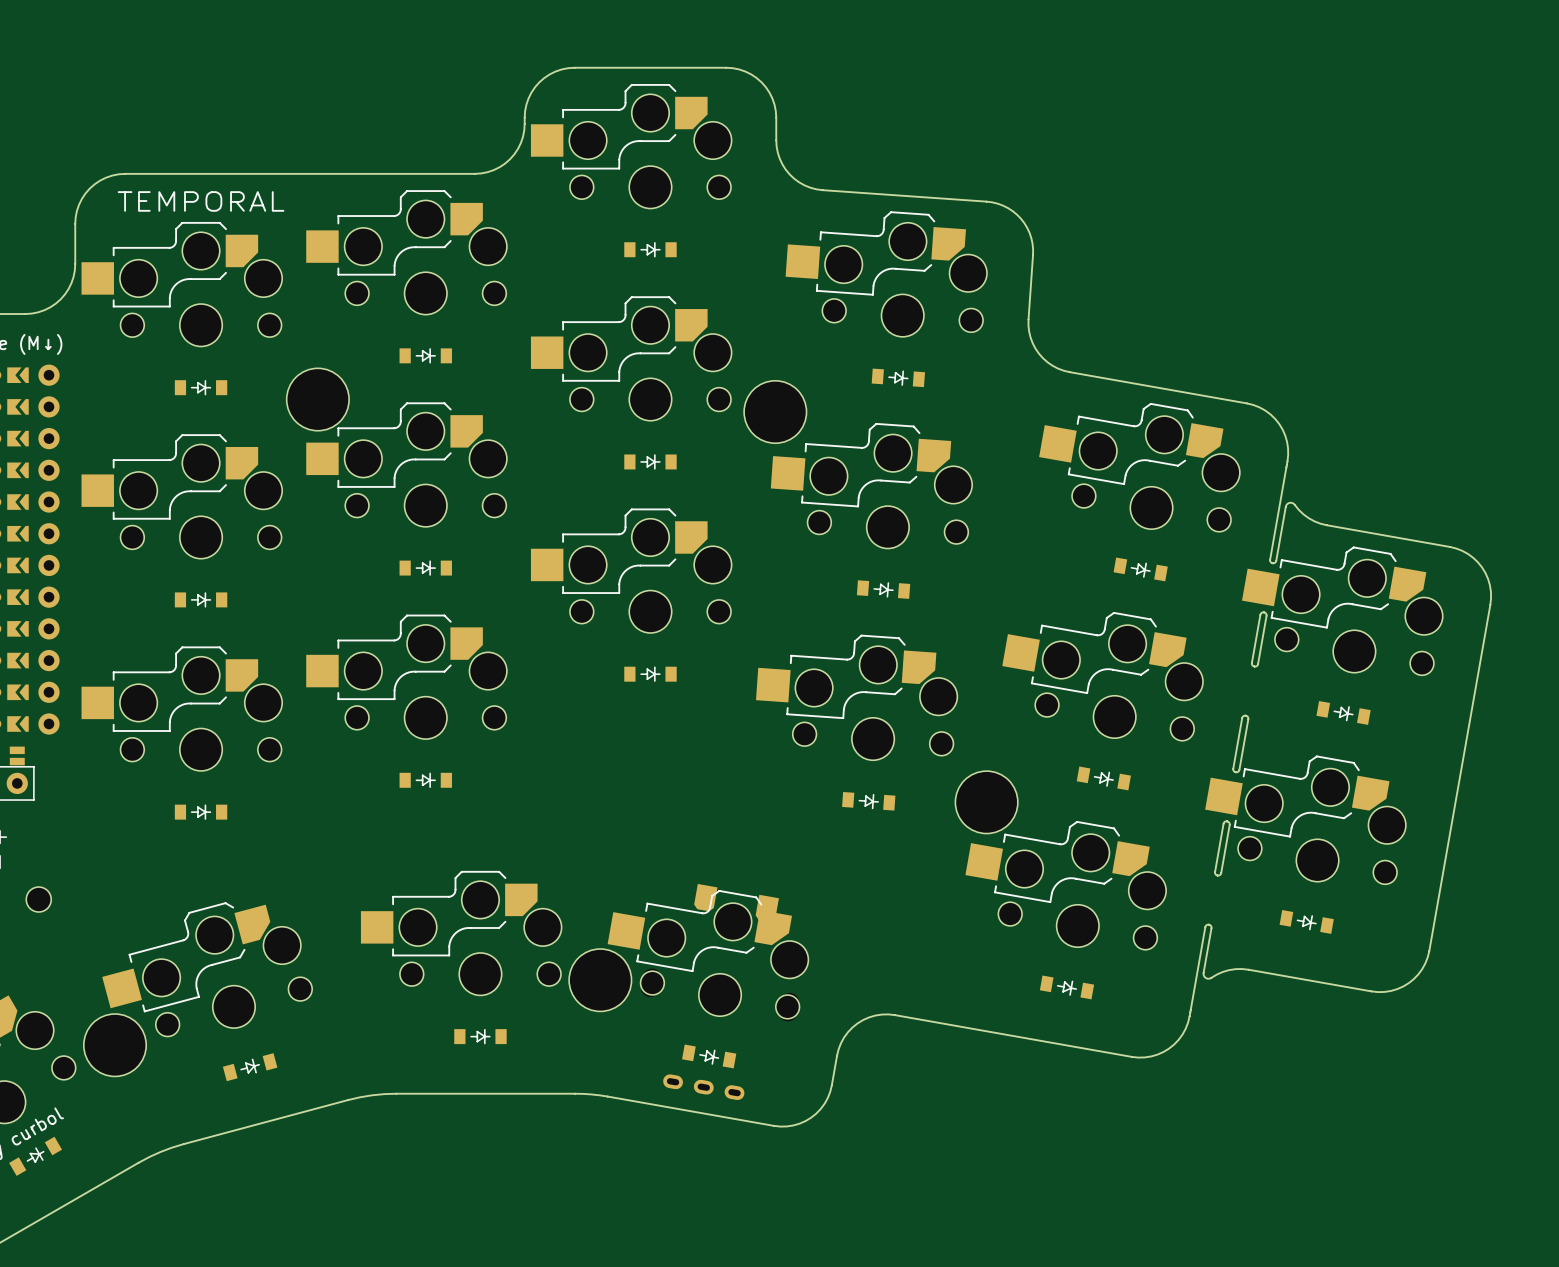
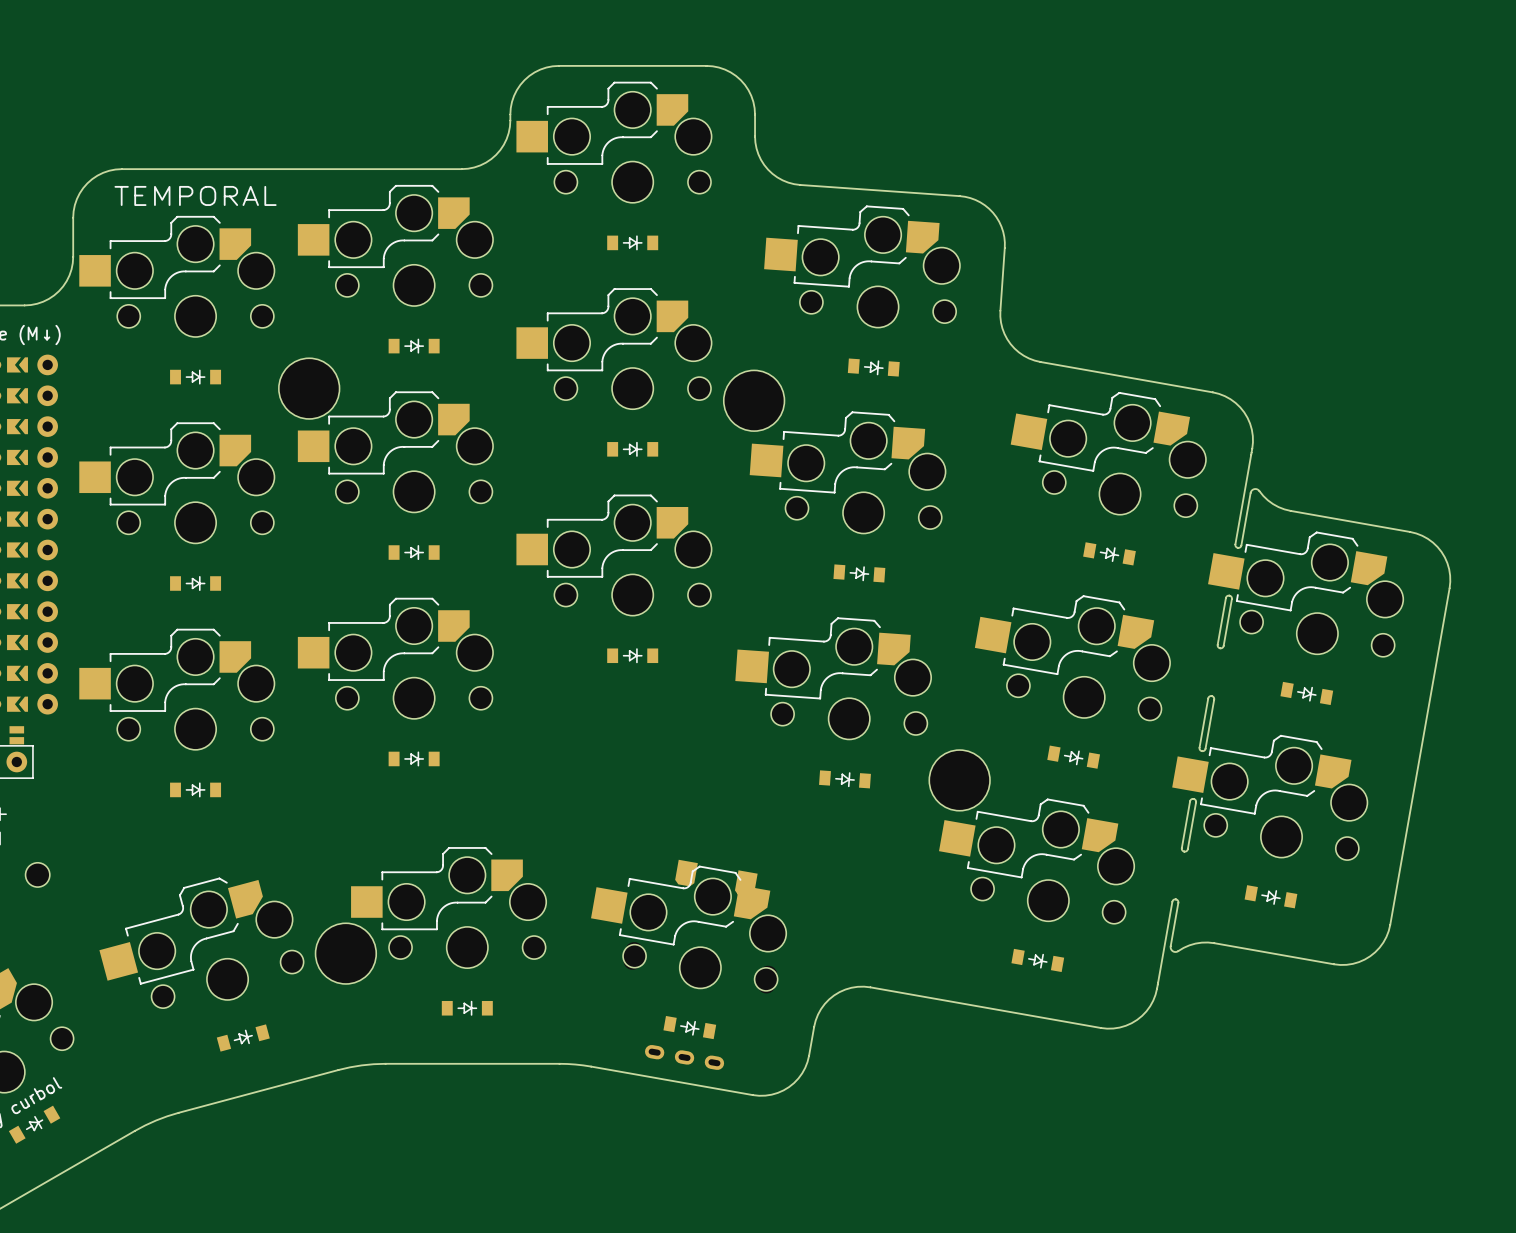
part: none -> (345, 953)
part: (600, 980) -> none
part: (115, 1045) -> none

